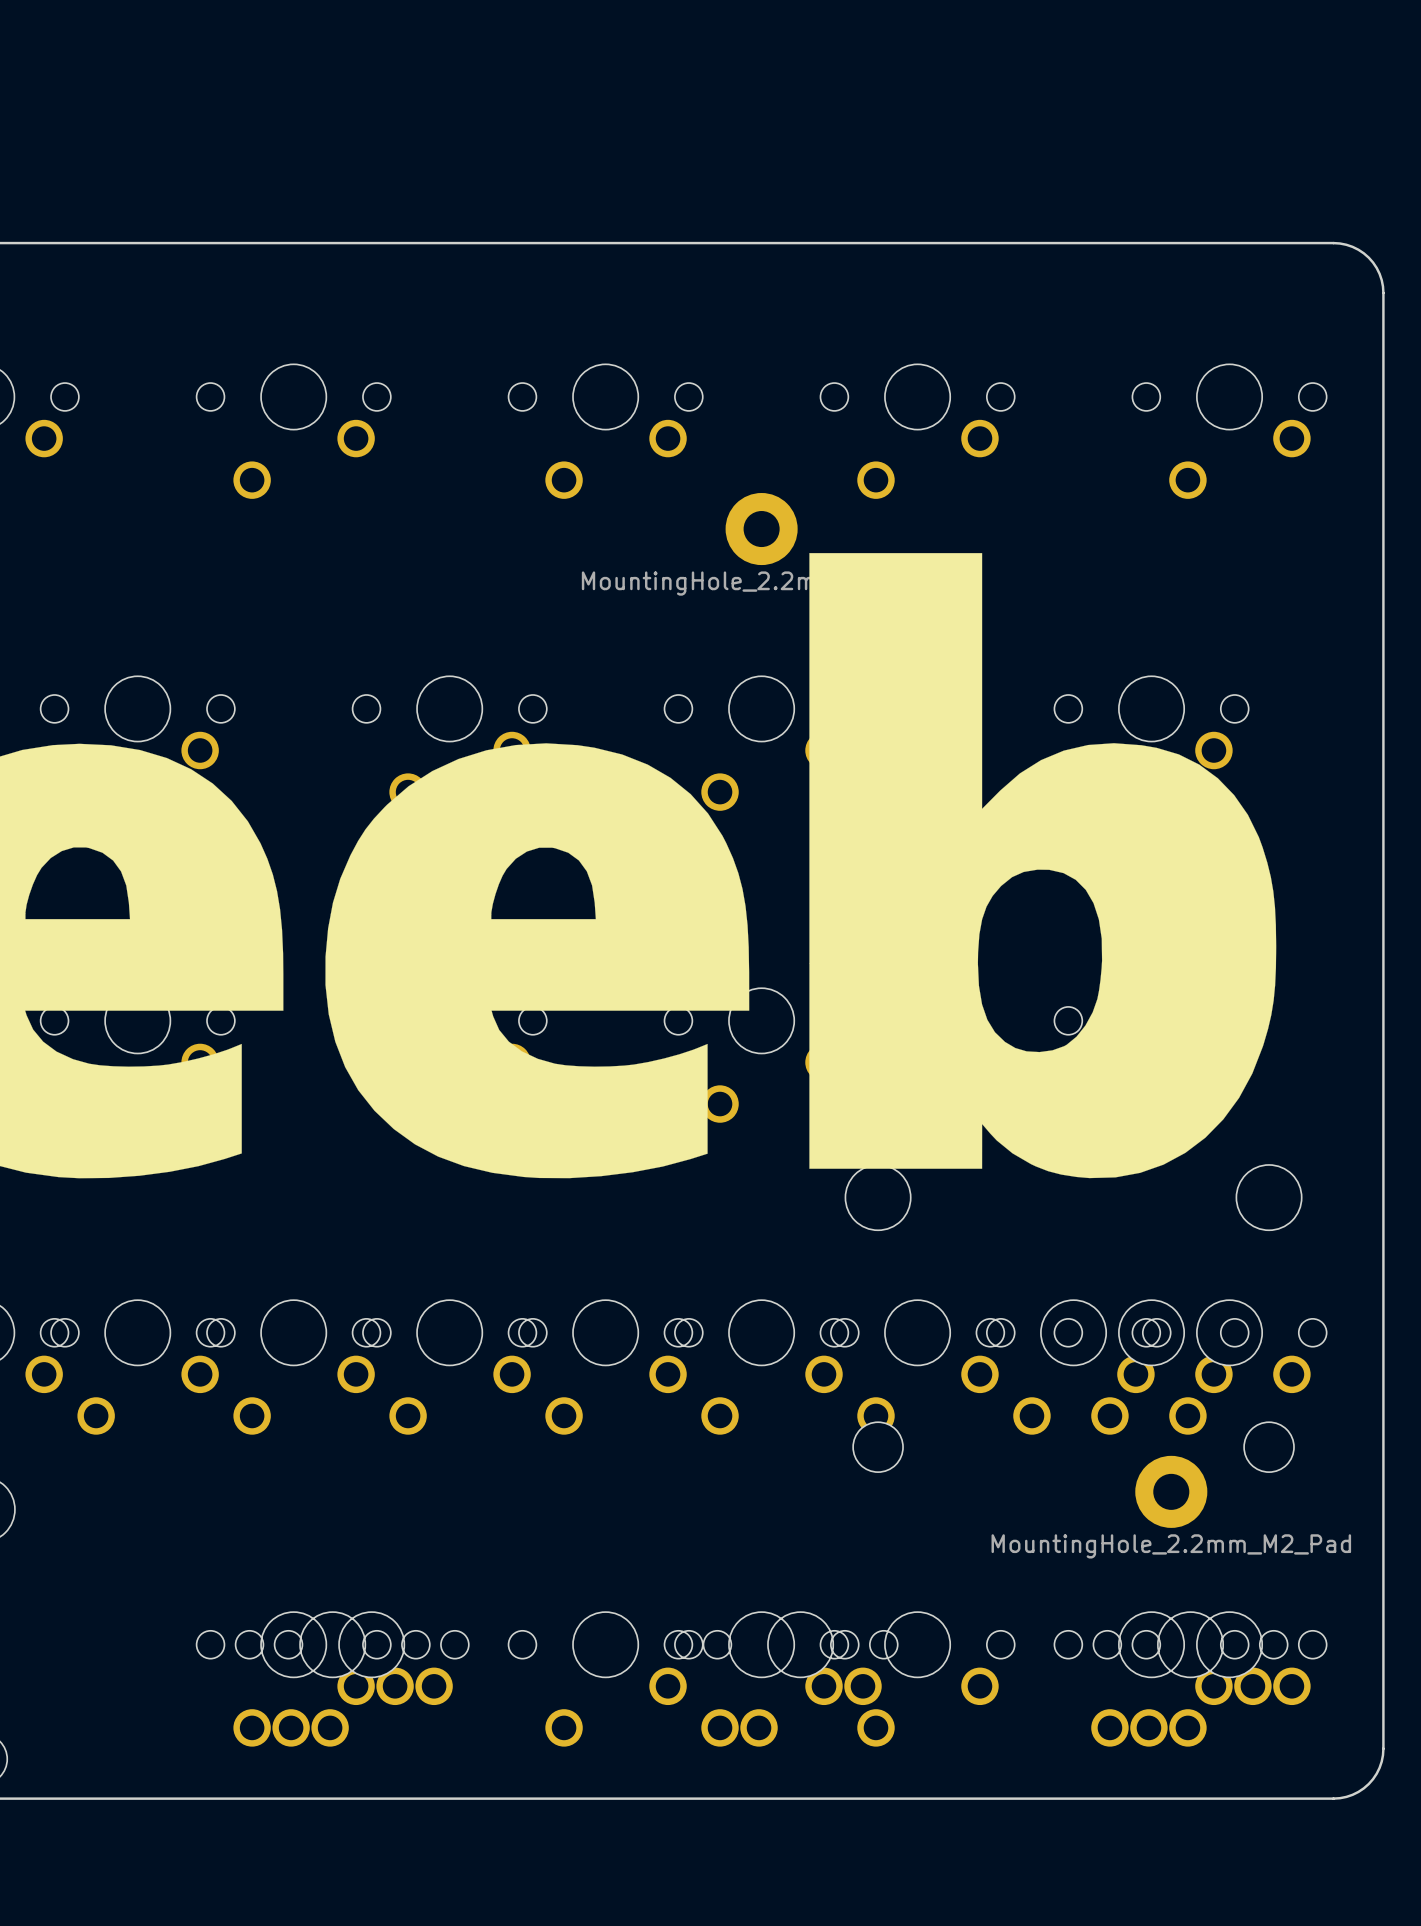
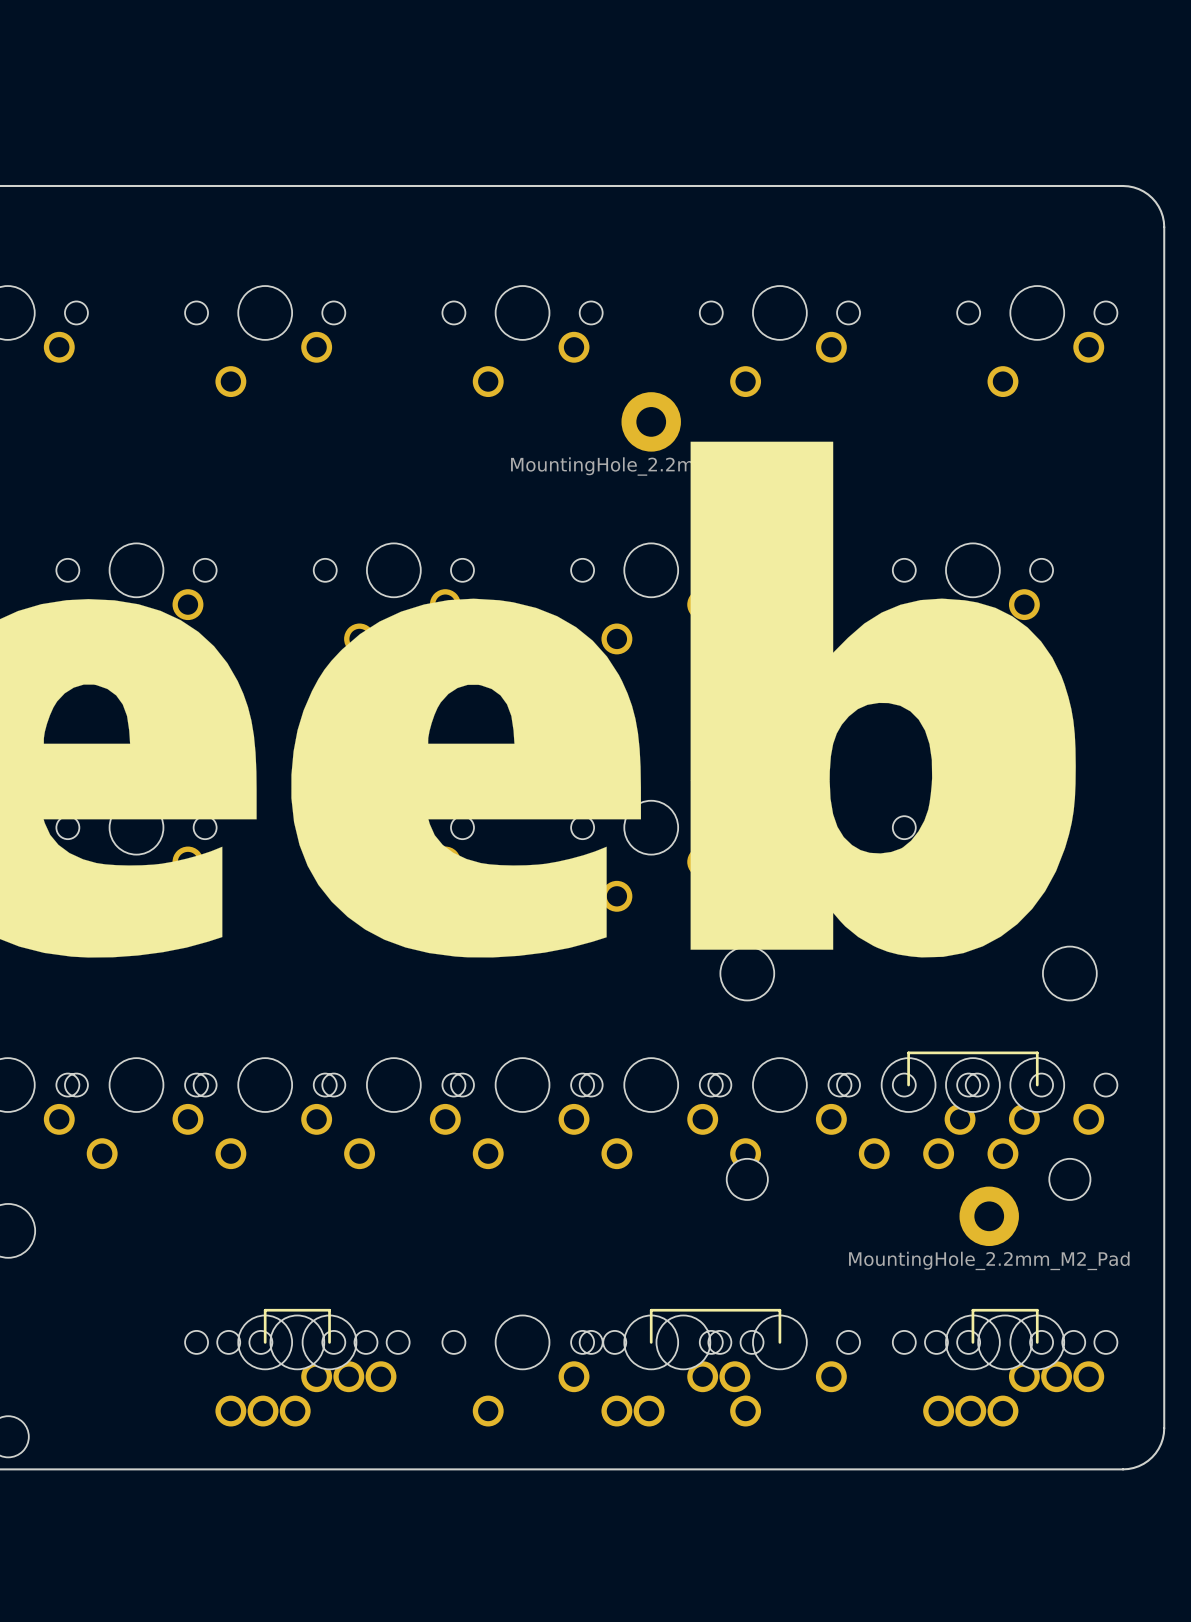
line: none -> (908, 1085) (908, 1052) (1037, 1052) (1037, 1085)
line: none -> (265, 1342) (265, 1310) (329, 1310) (329, 1342)
line: none -> (651, 1342) (651, 1310) (779, 1310) (779, 1342)
line: none -> (972, 1342) (972, 1310) (1037, 1310) (1037, 1342)

